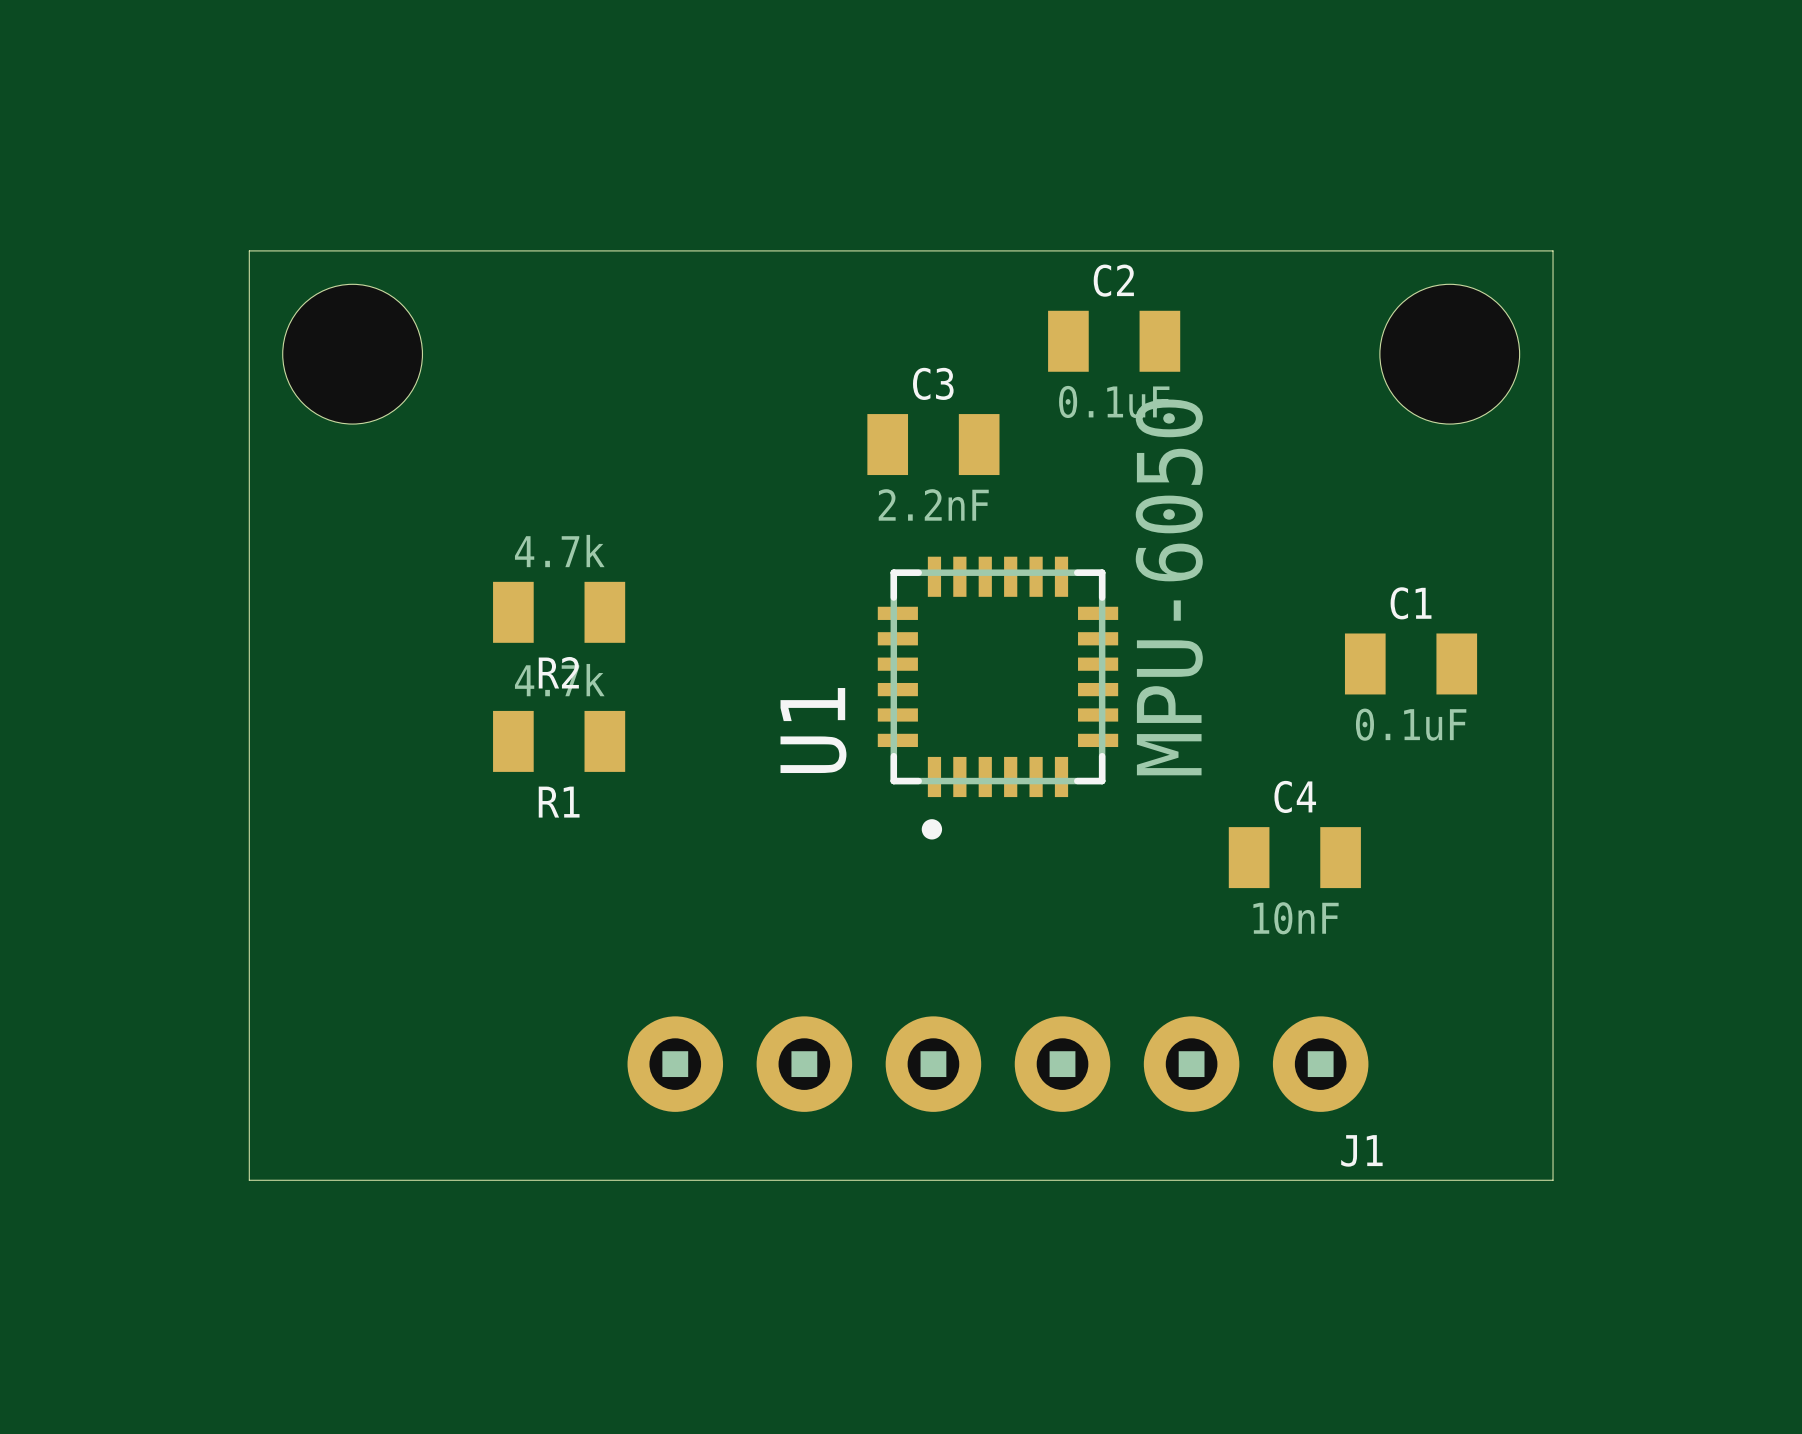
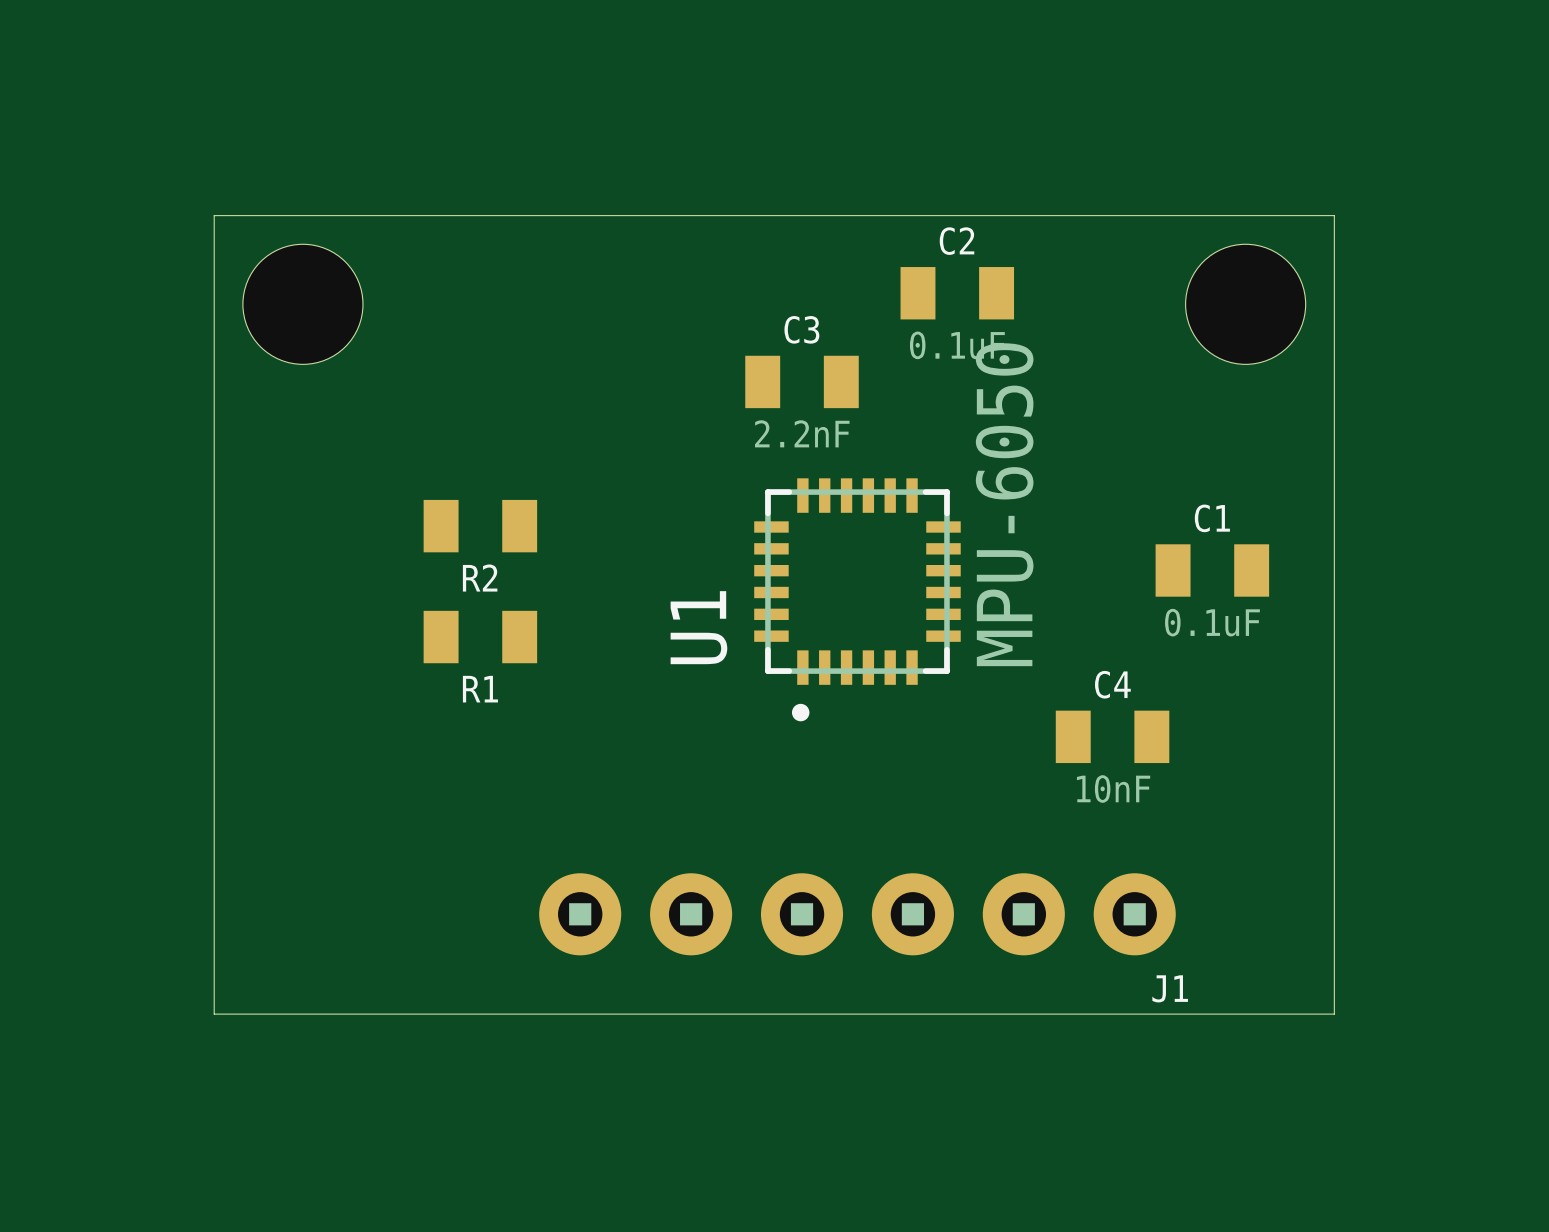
R2 value: 4.7k (559, 551) -> none
R1 value: 4.7k (559, 680) -> none

